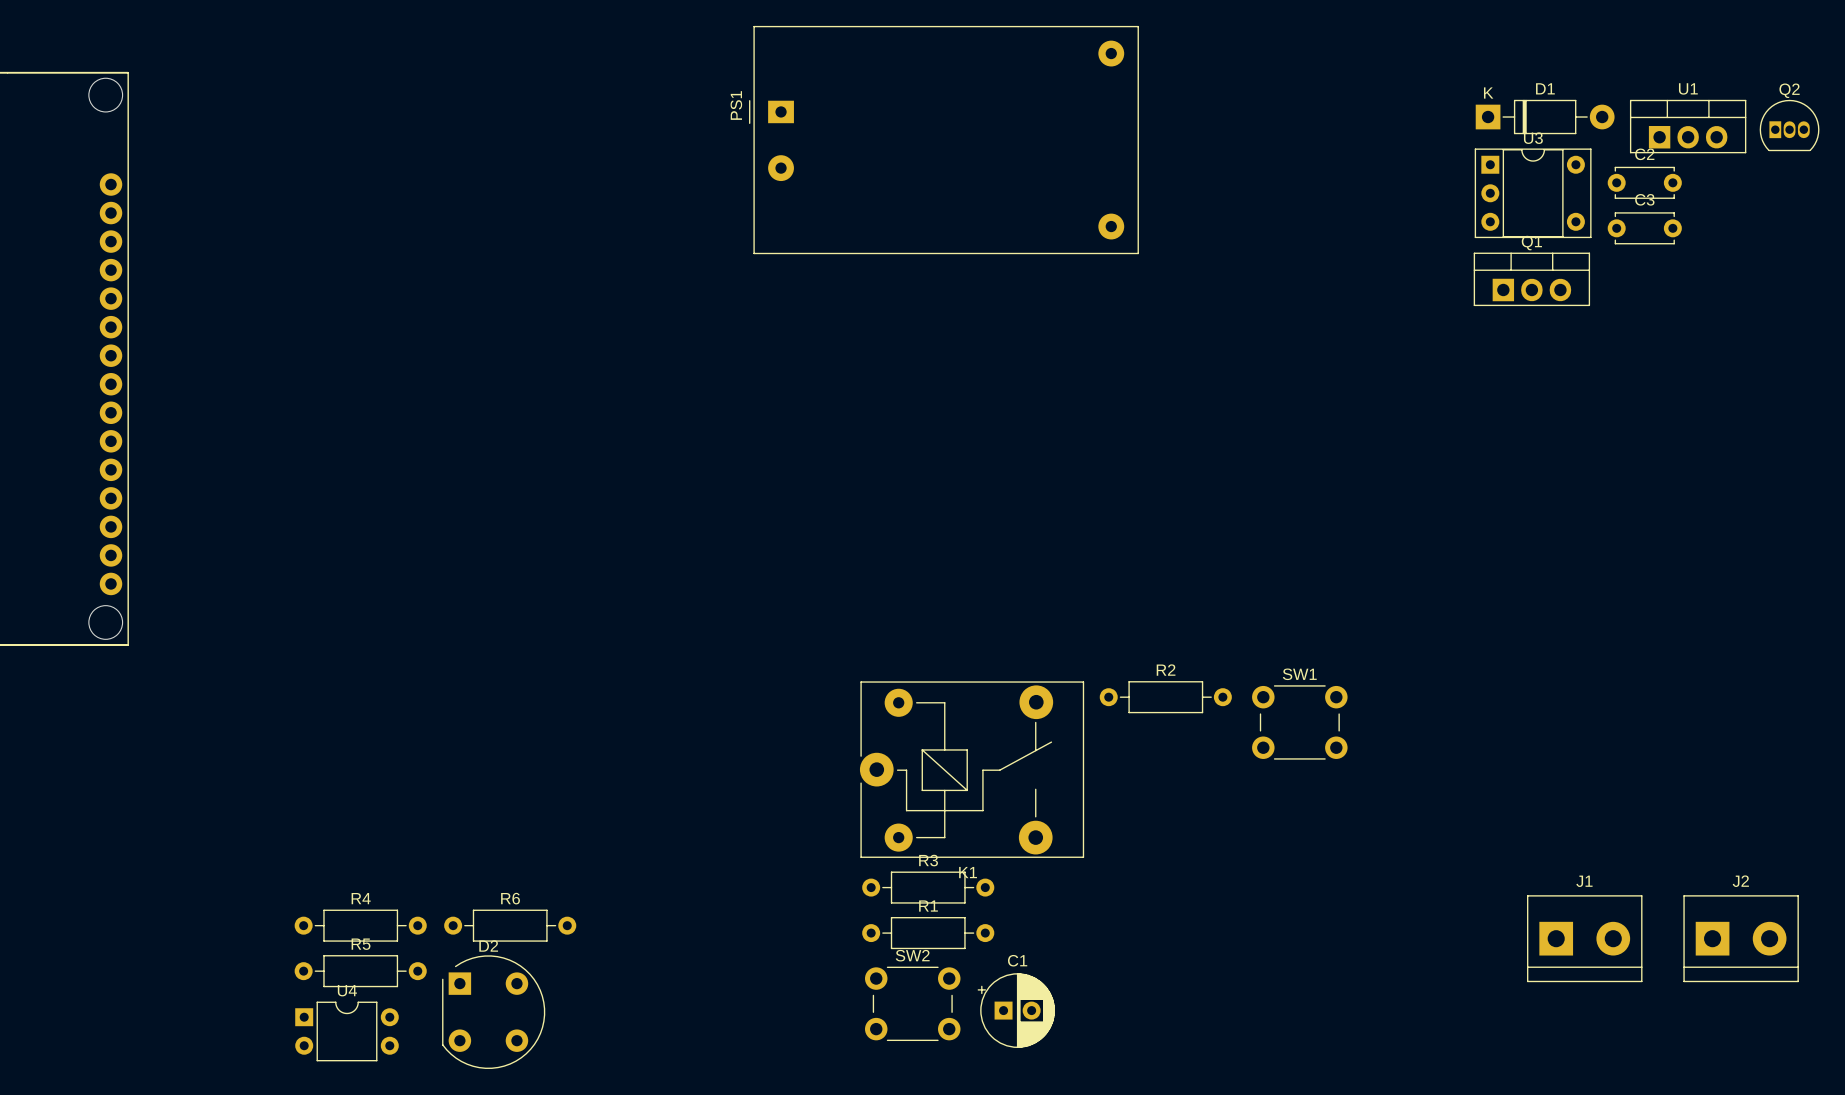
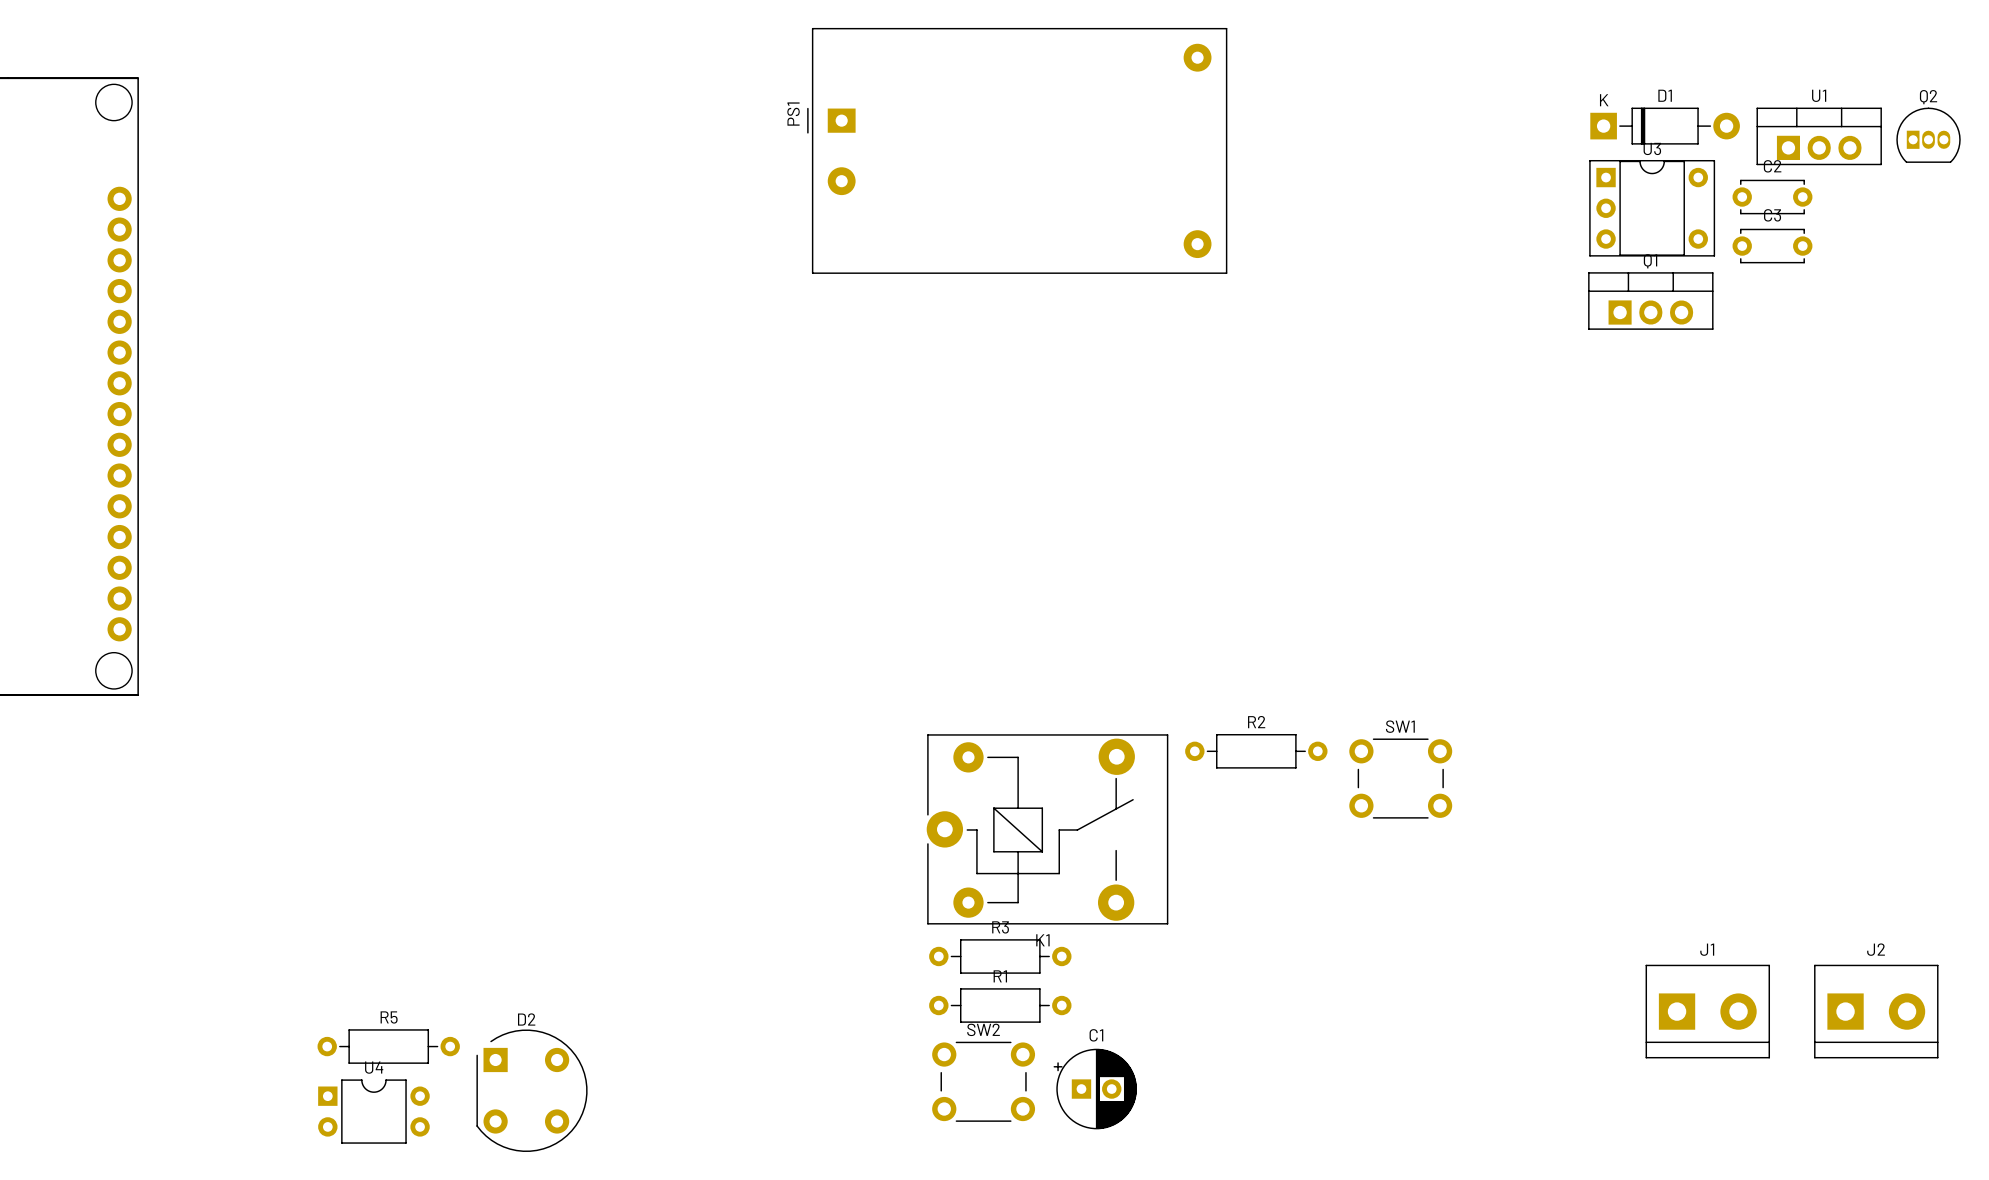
R4: (360, 925) -> none
R6: (510, 925) -> none

